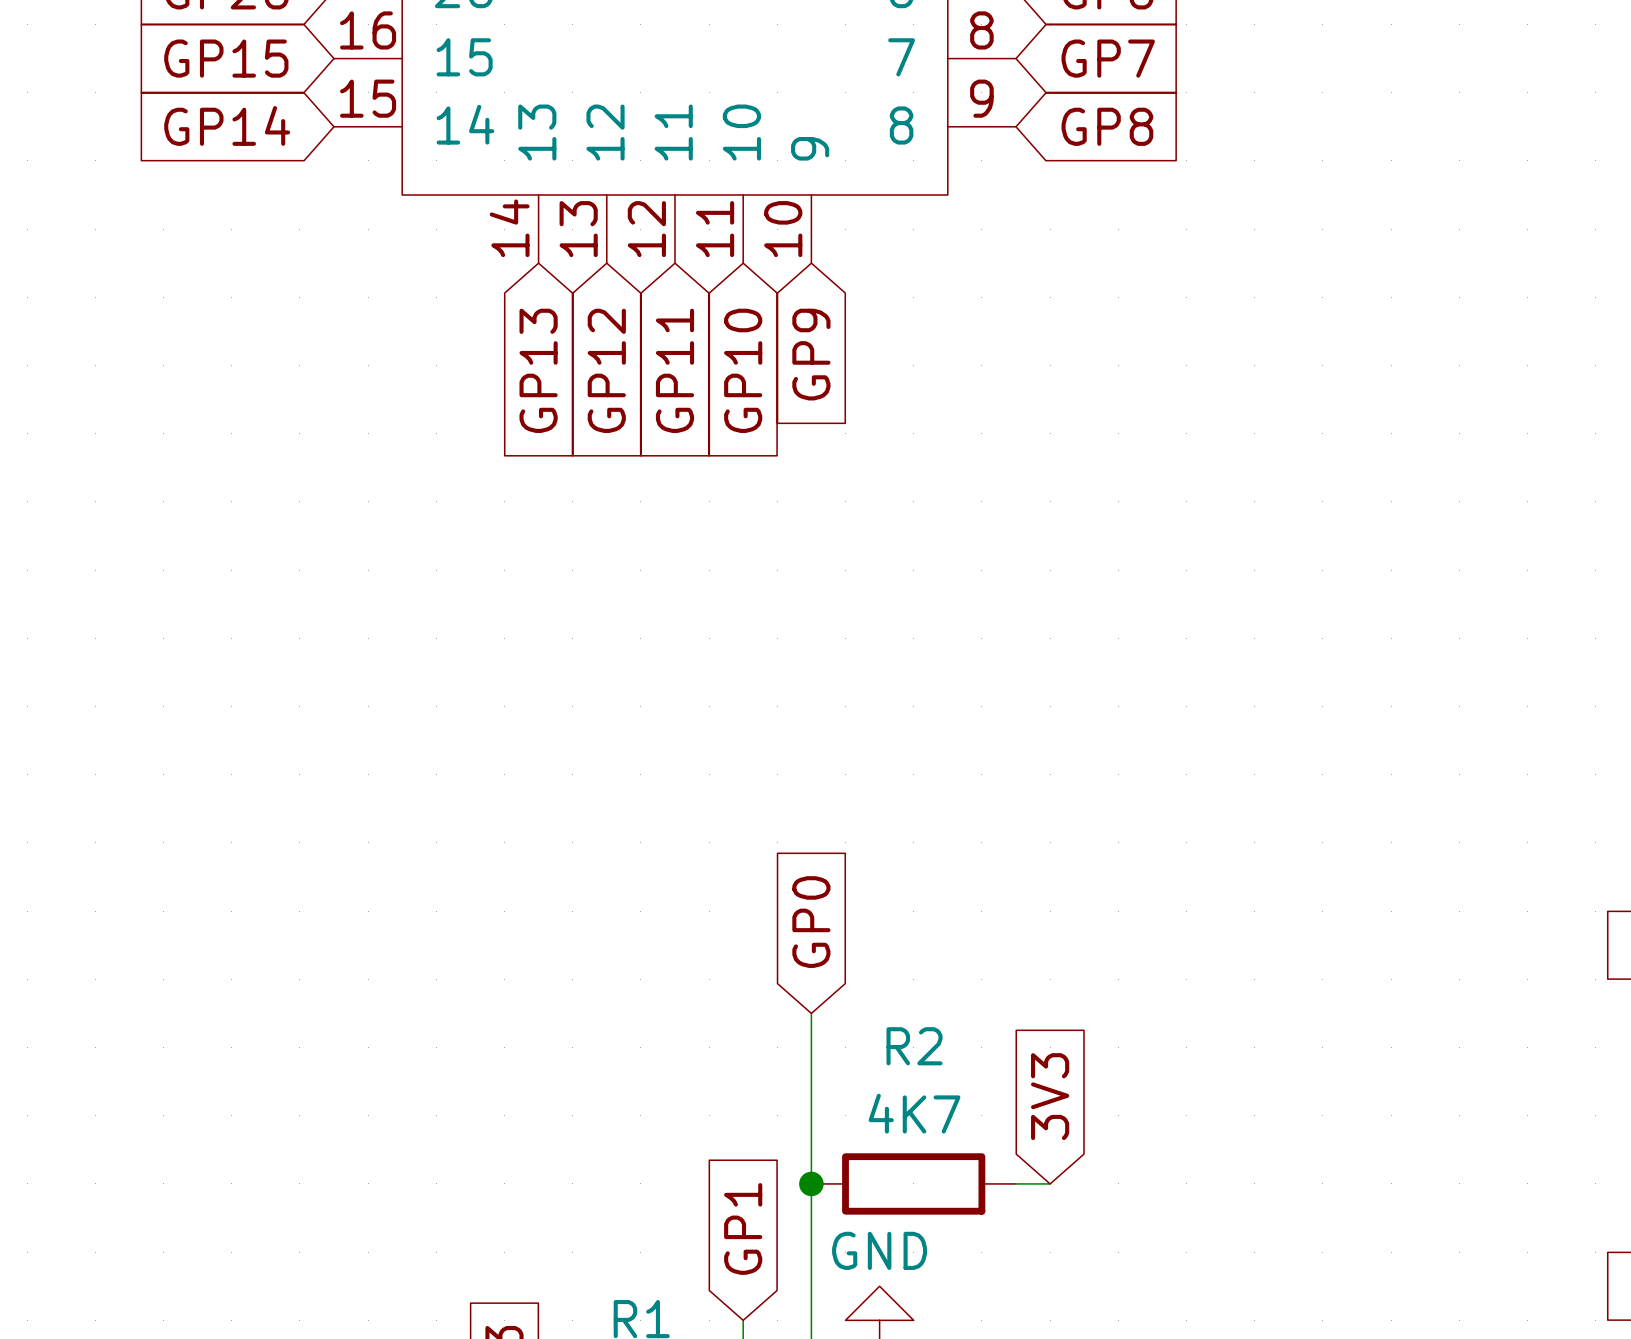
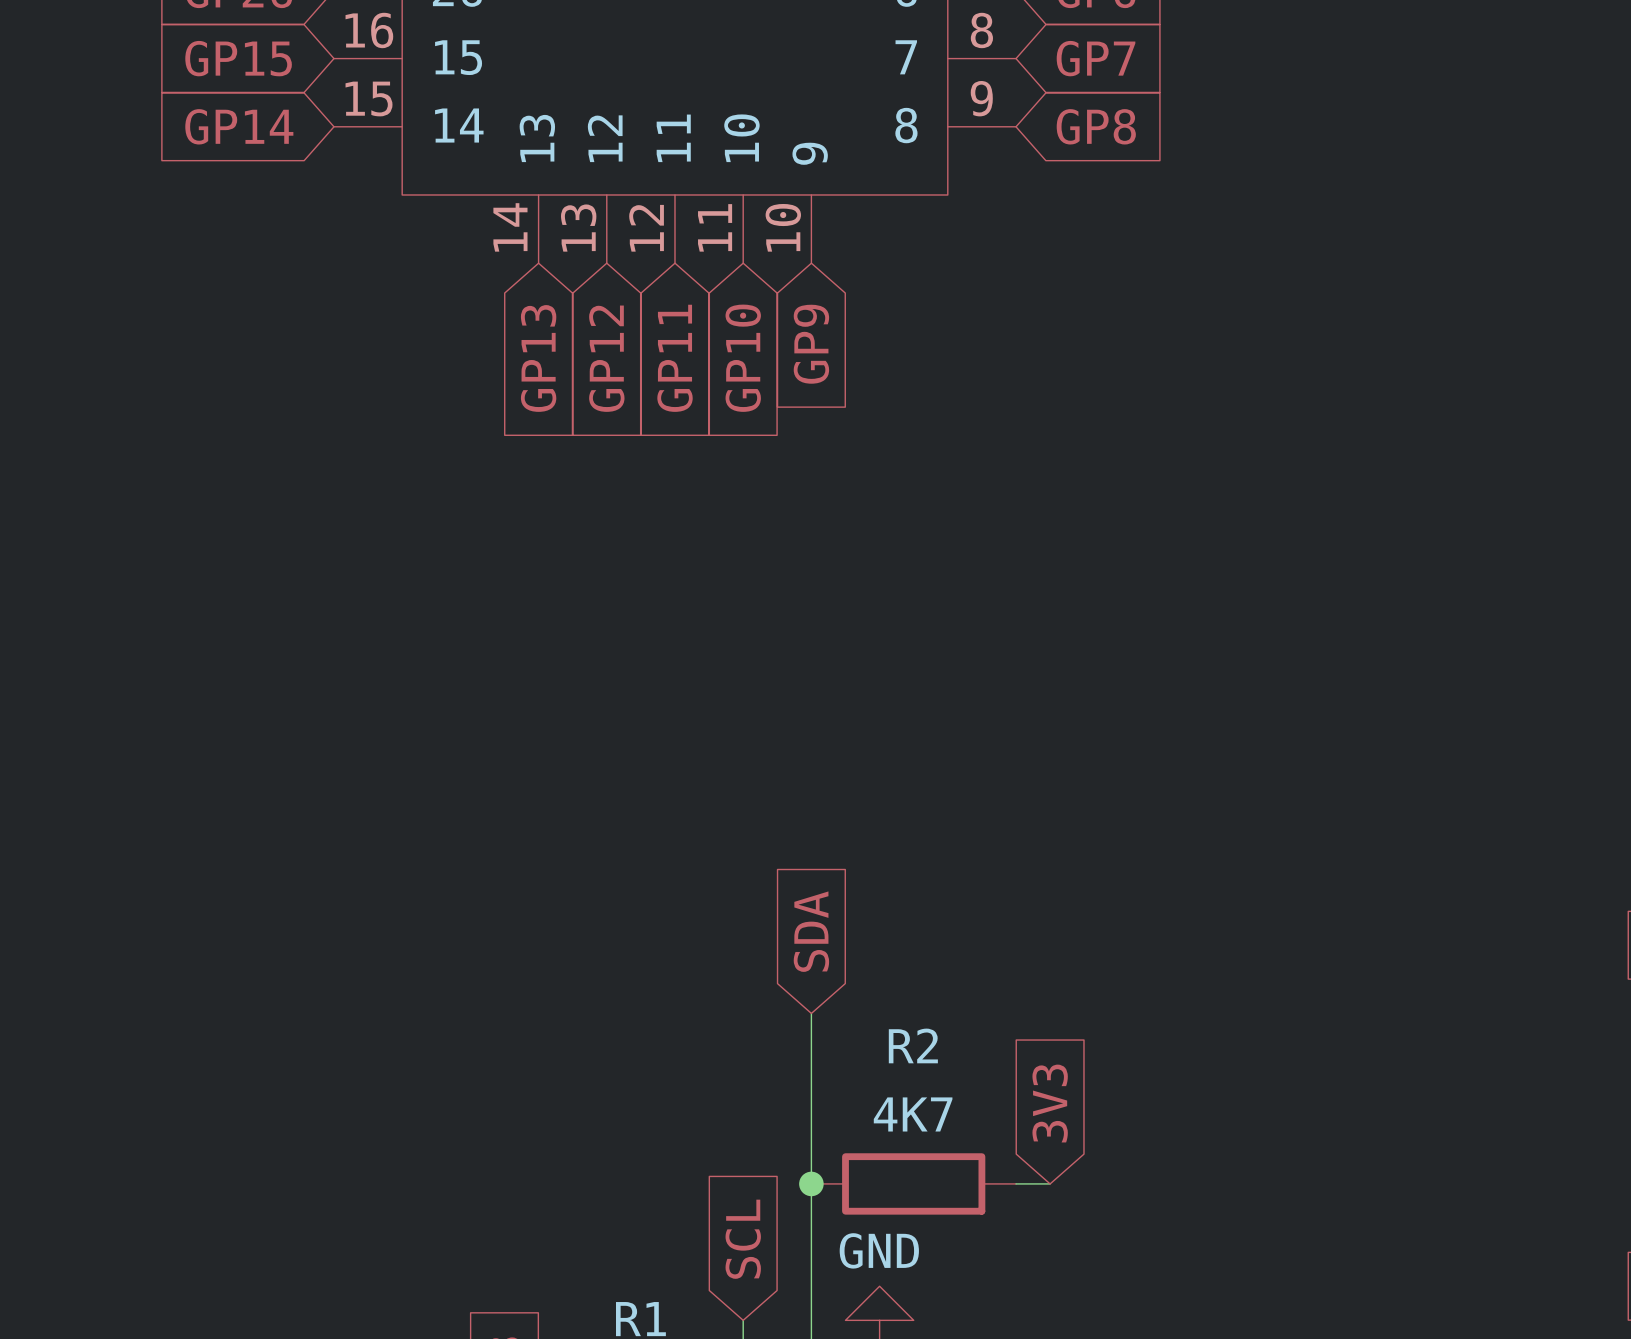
global label: GP0 (811, 922) -> SDA (811, 931)
global label: GP1 (743, 1228) -> SCL (743, 1239)

